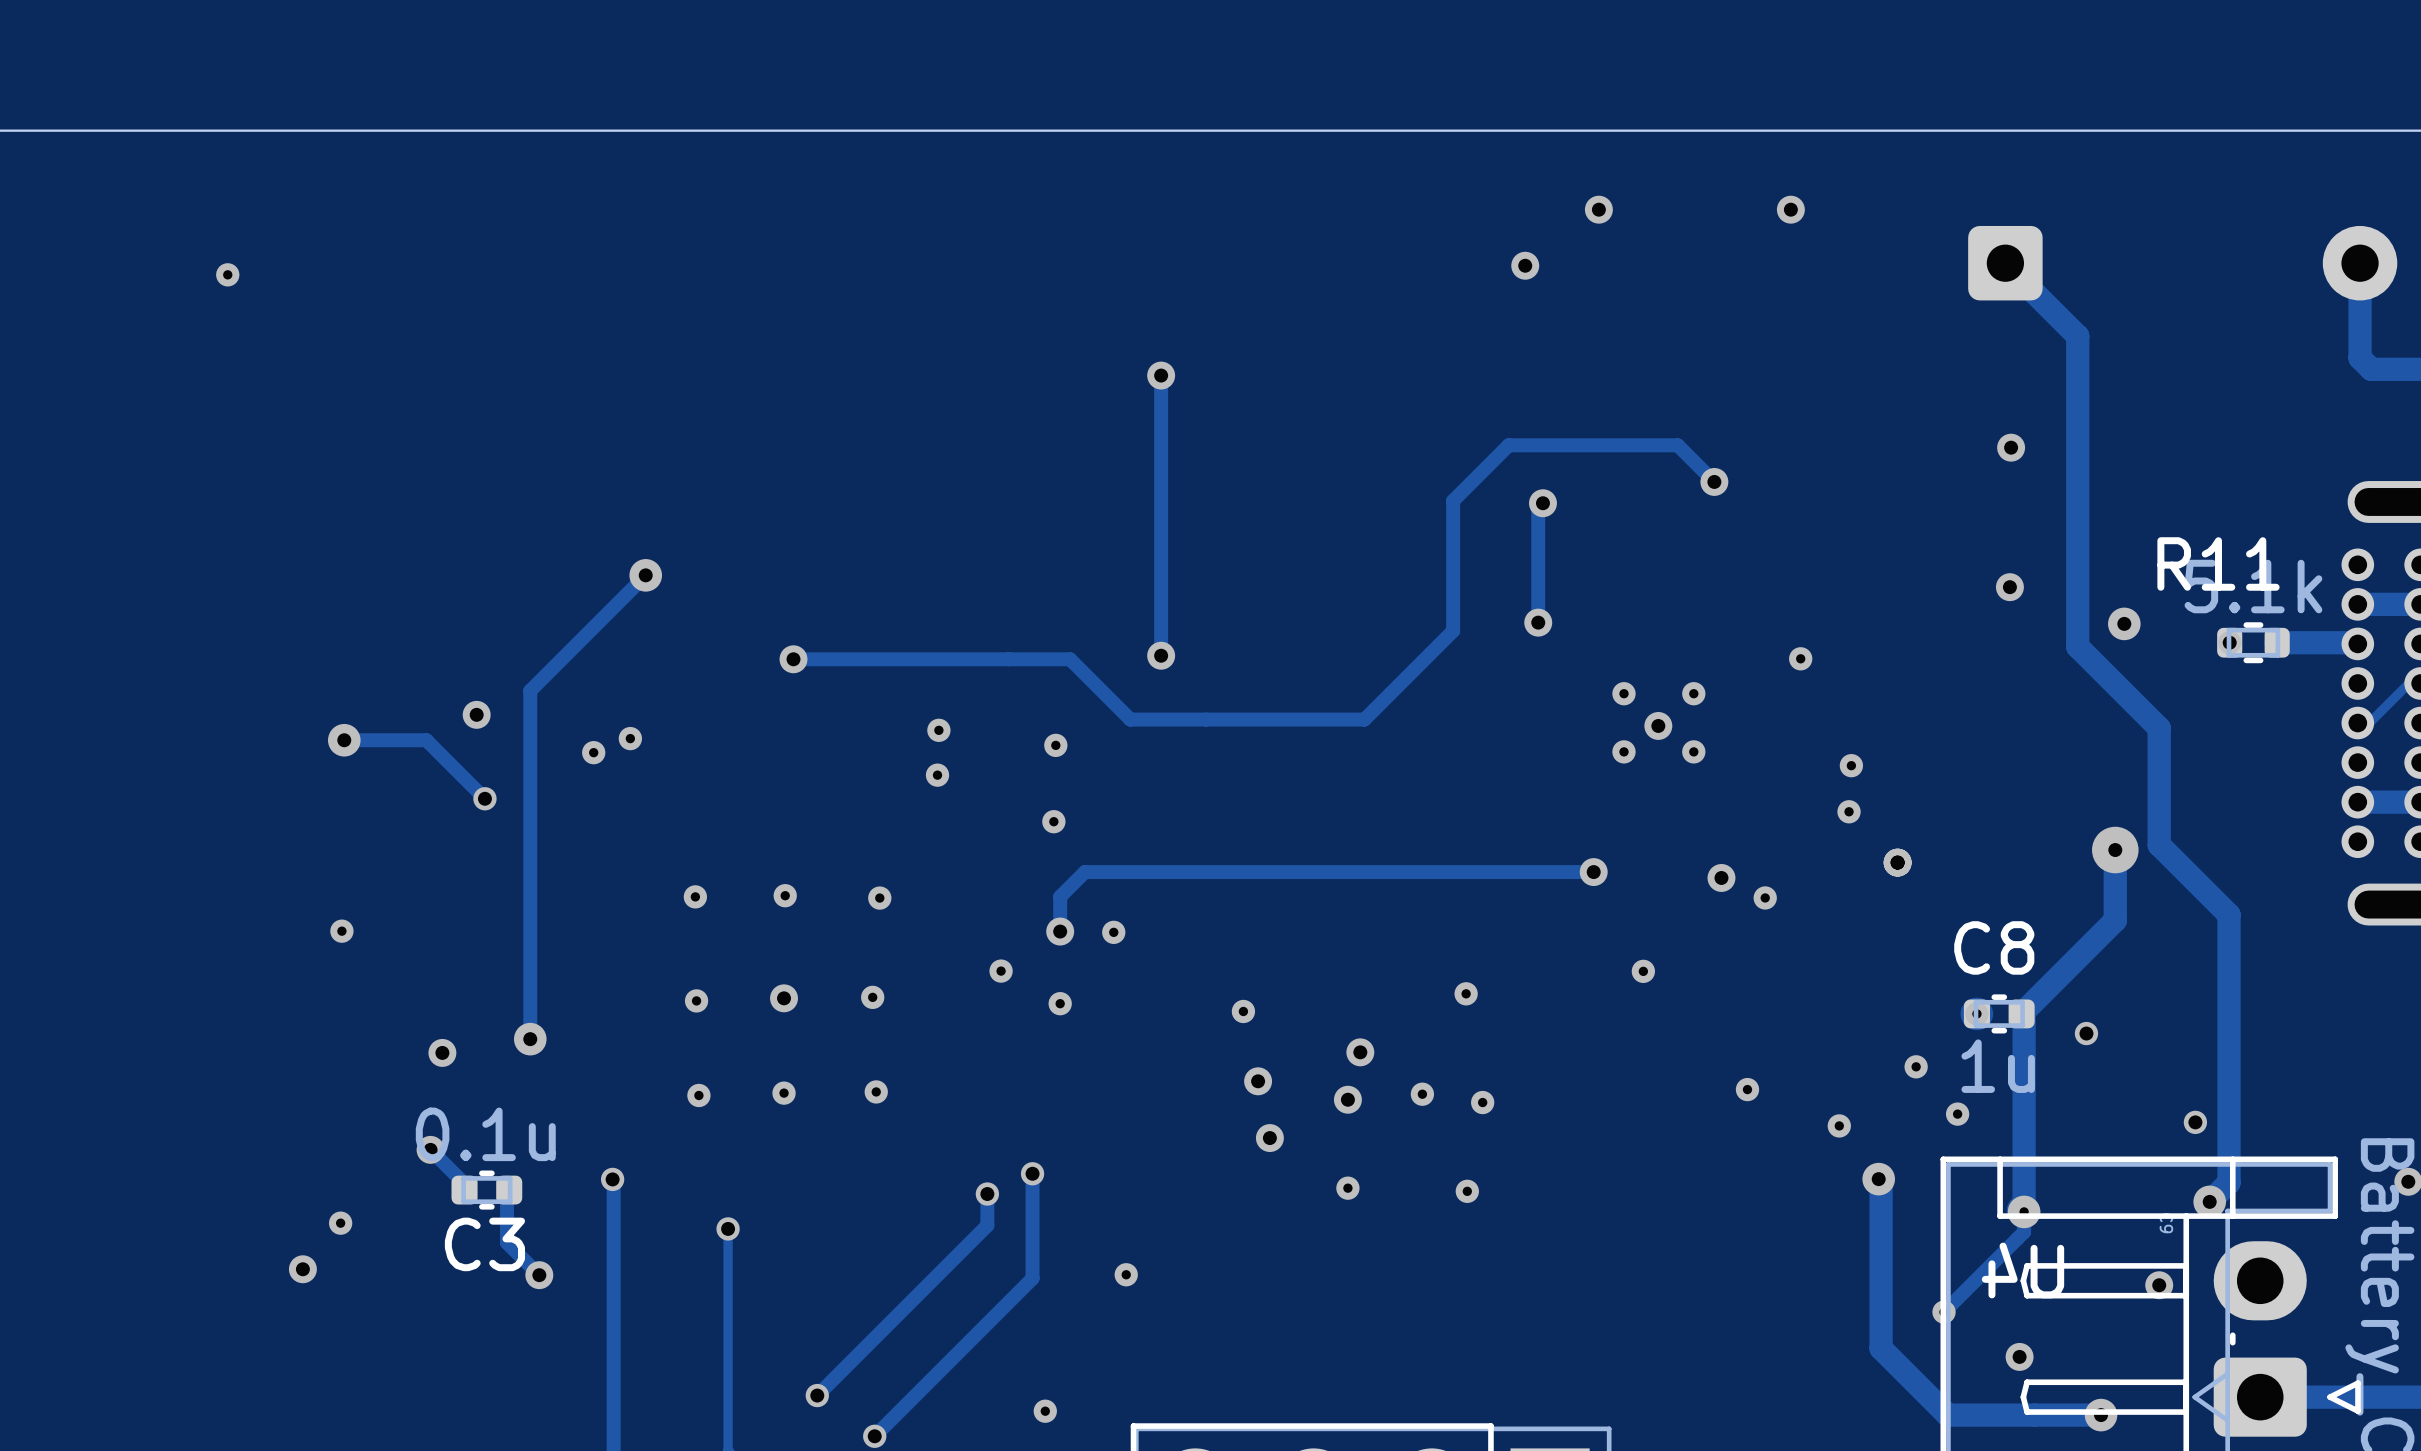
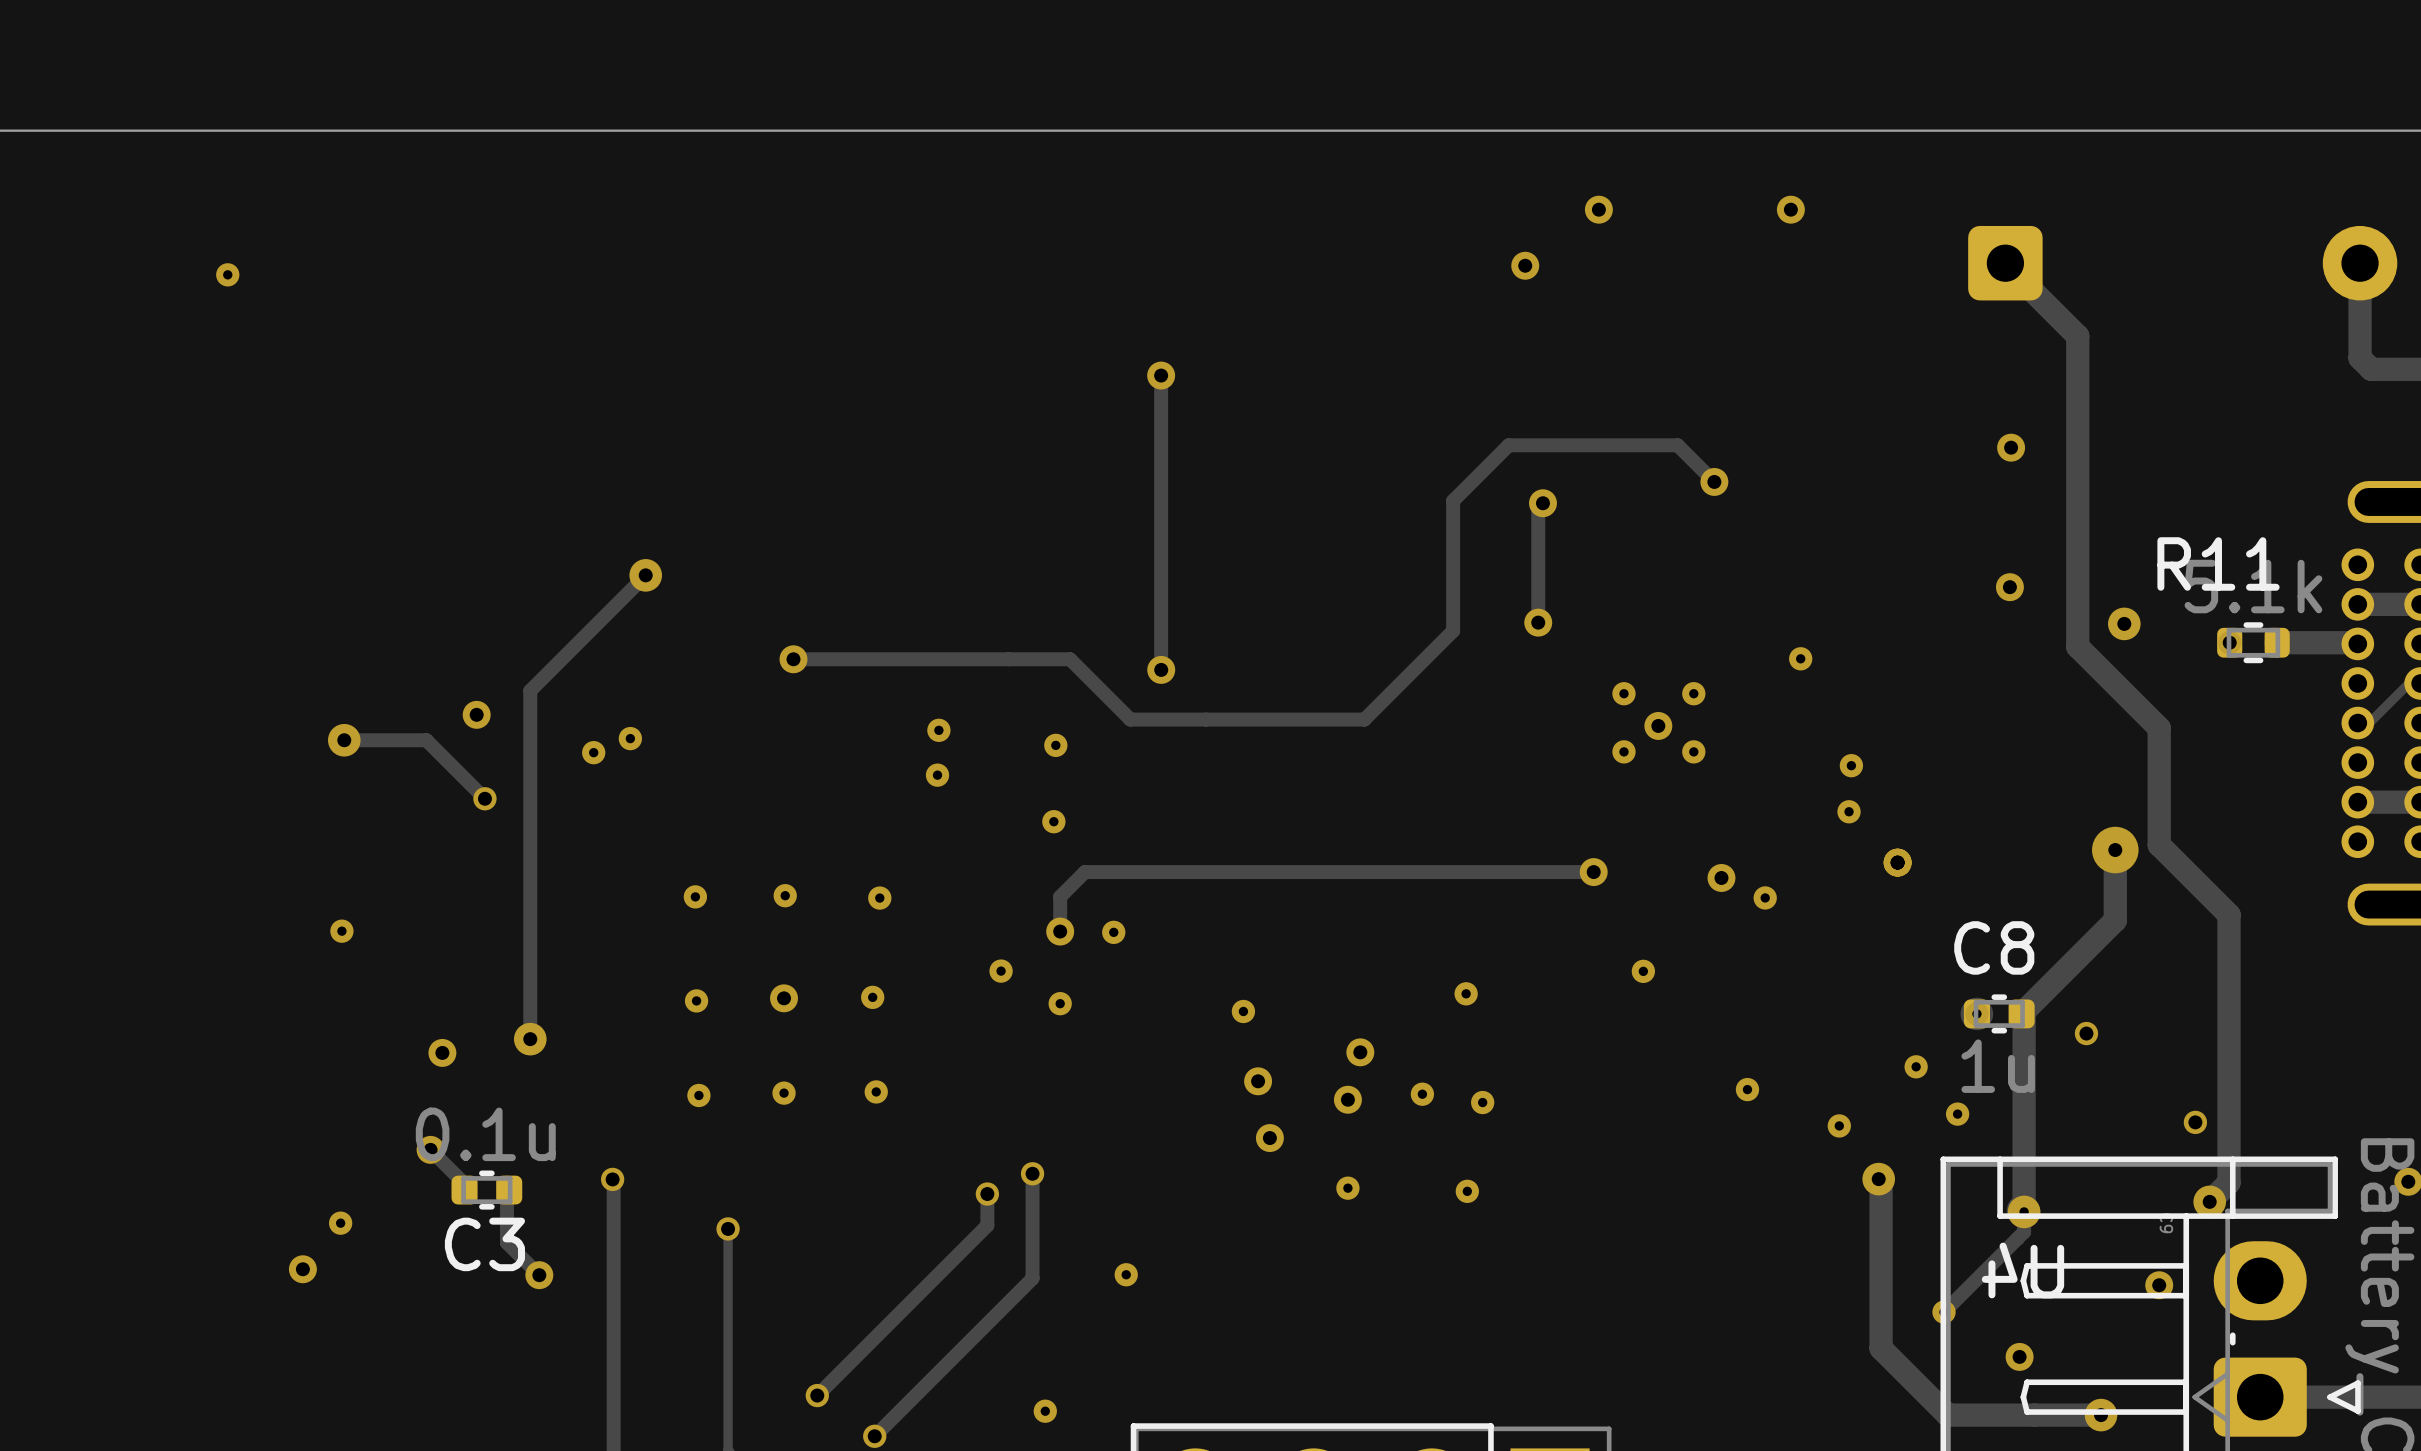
via position: (1161, 655) -> (1161, 669)

